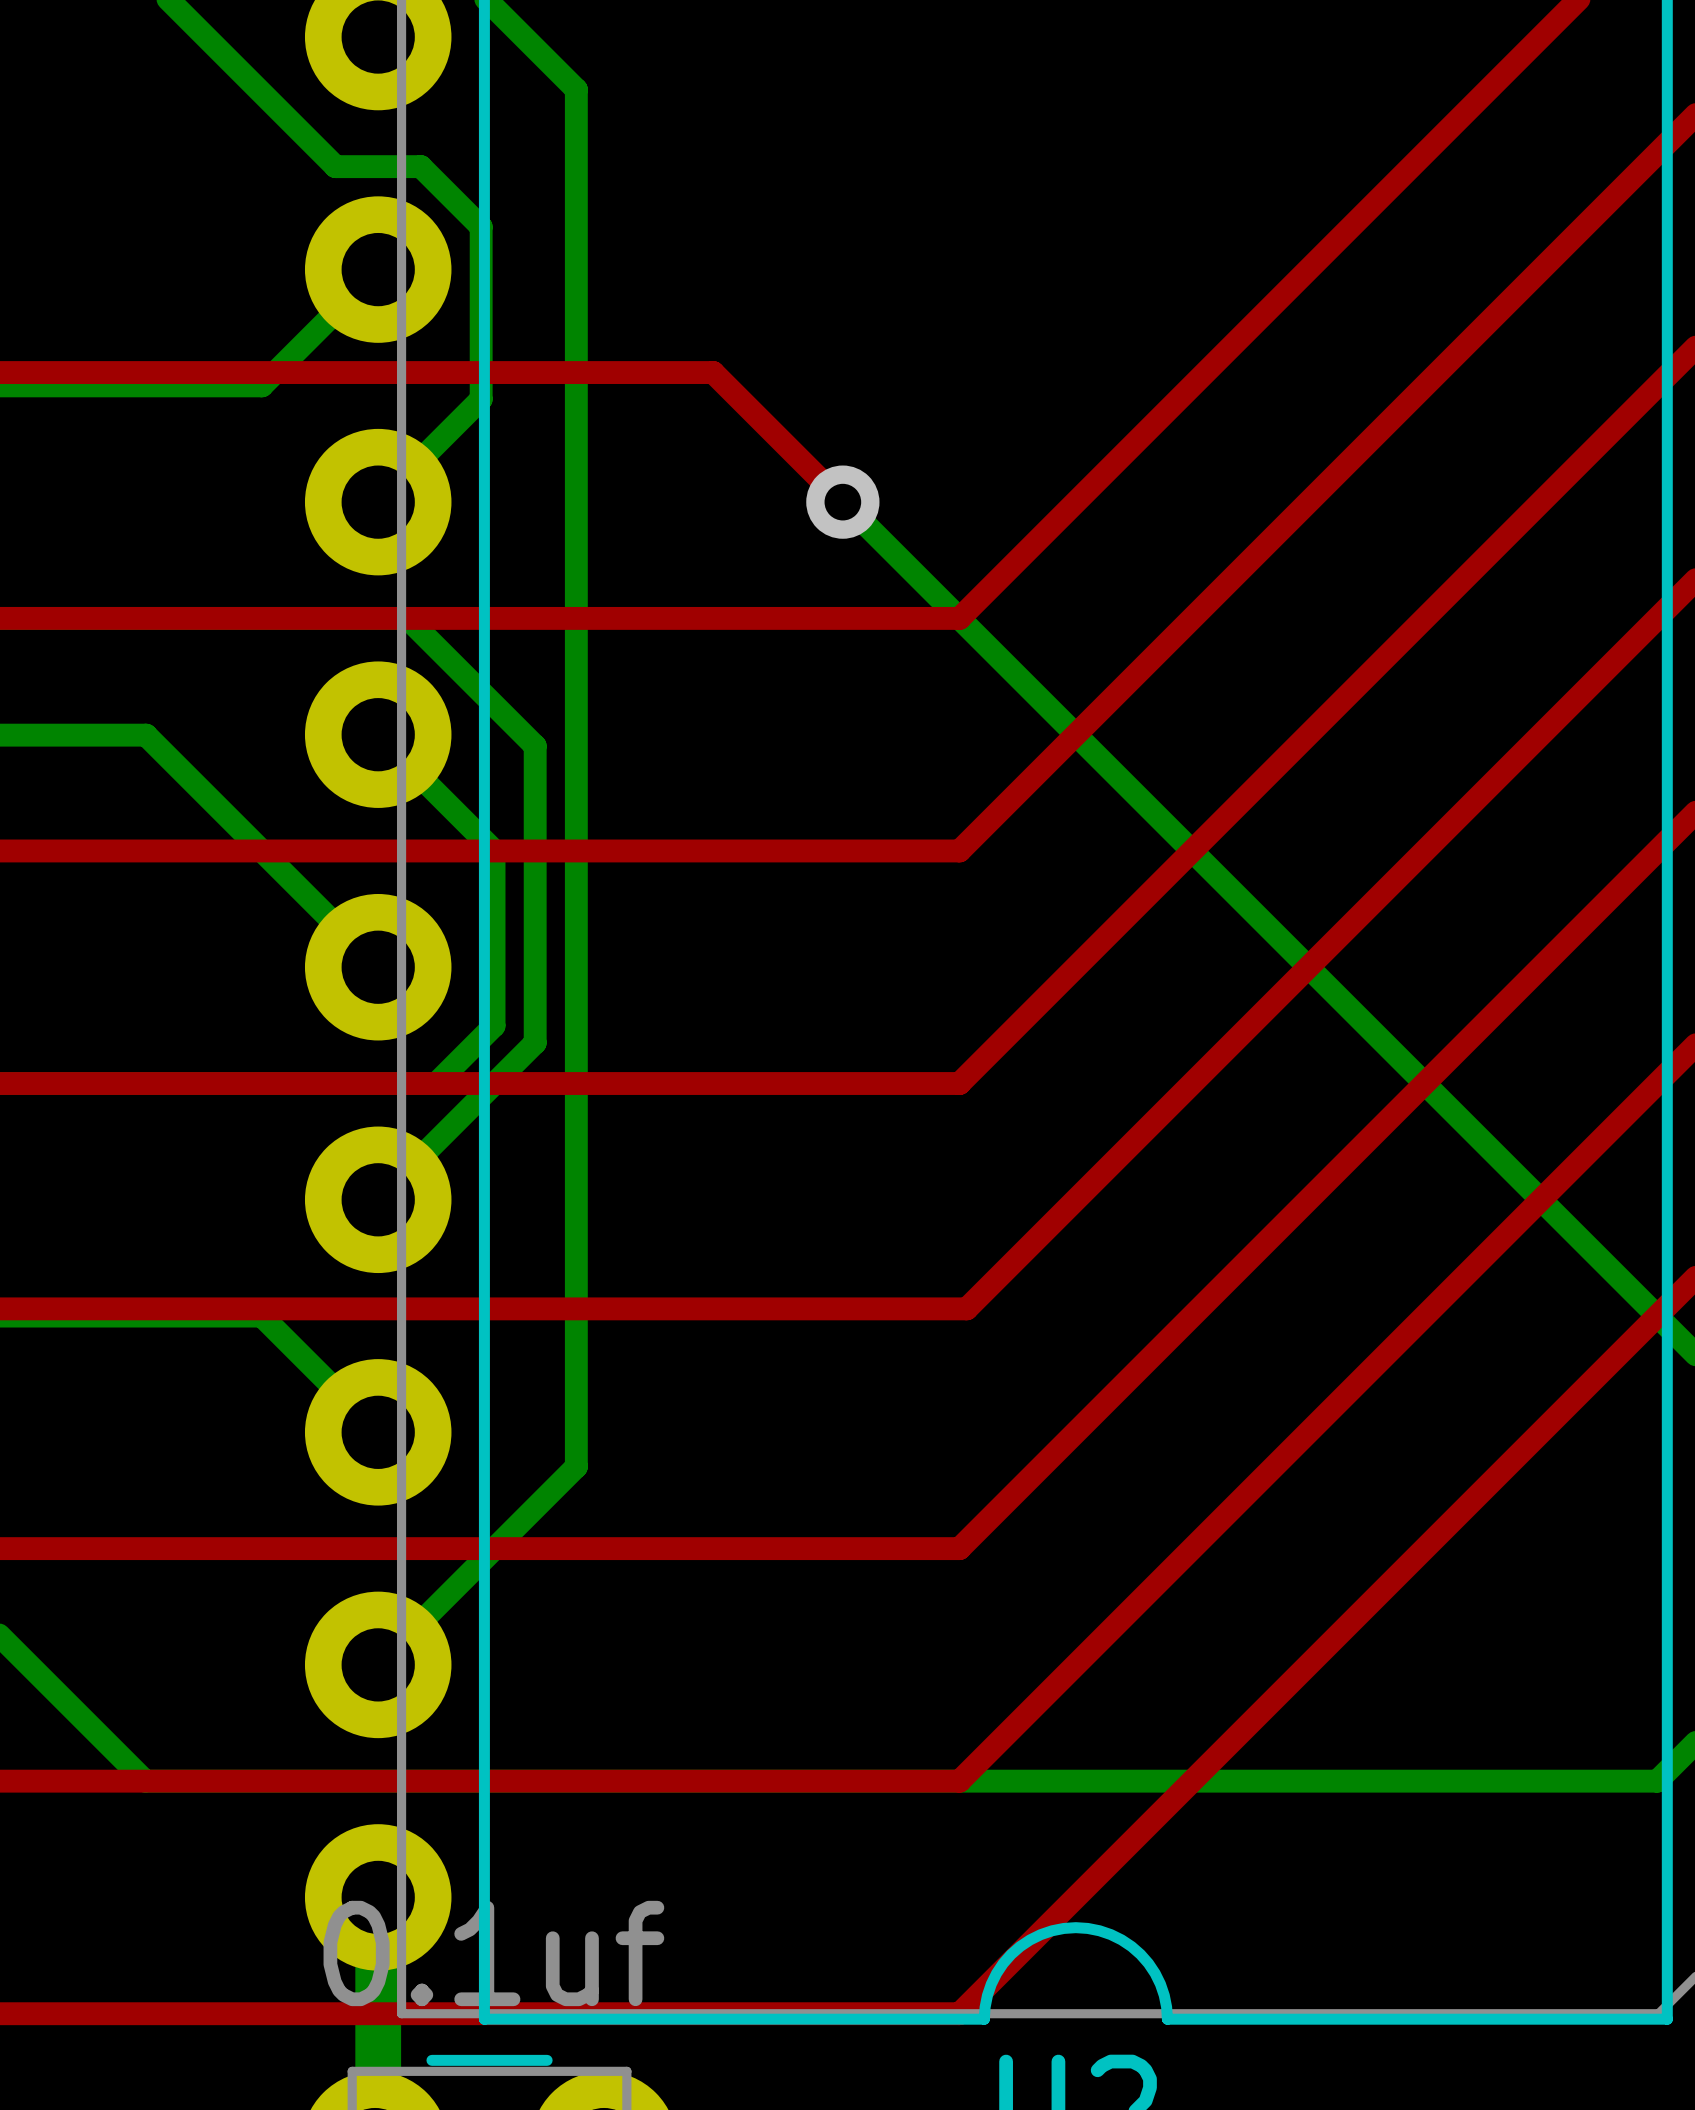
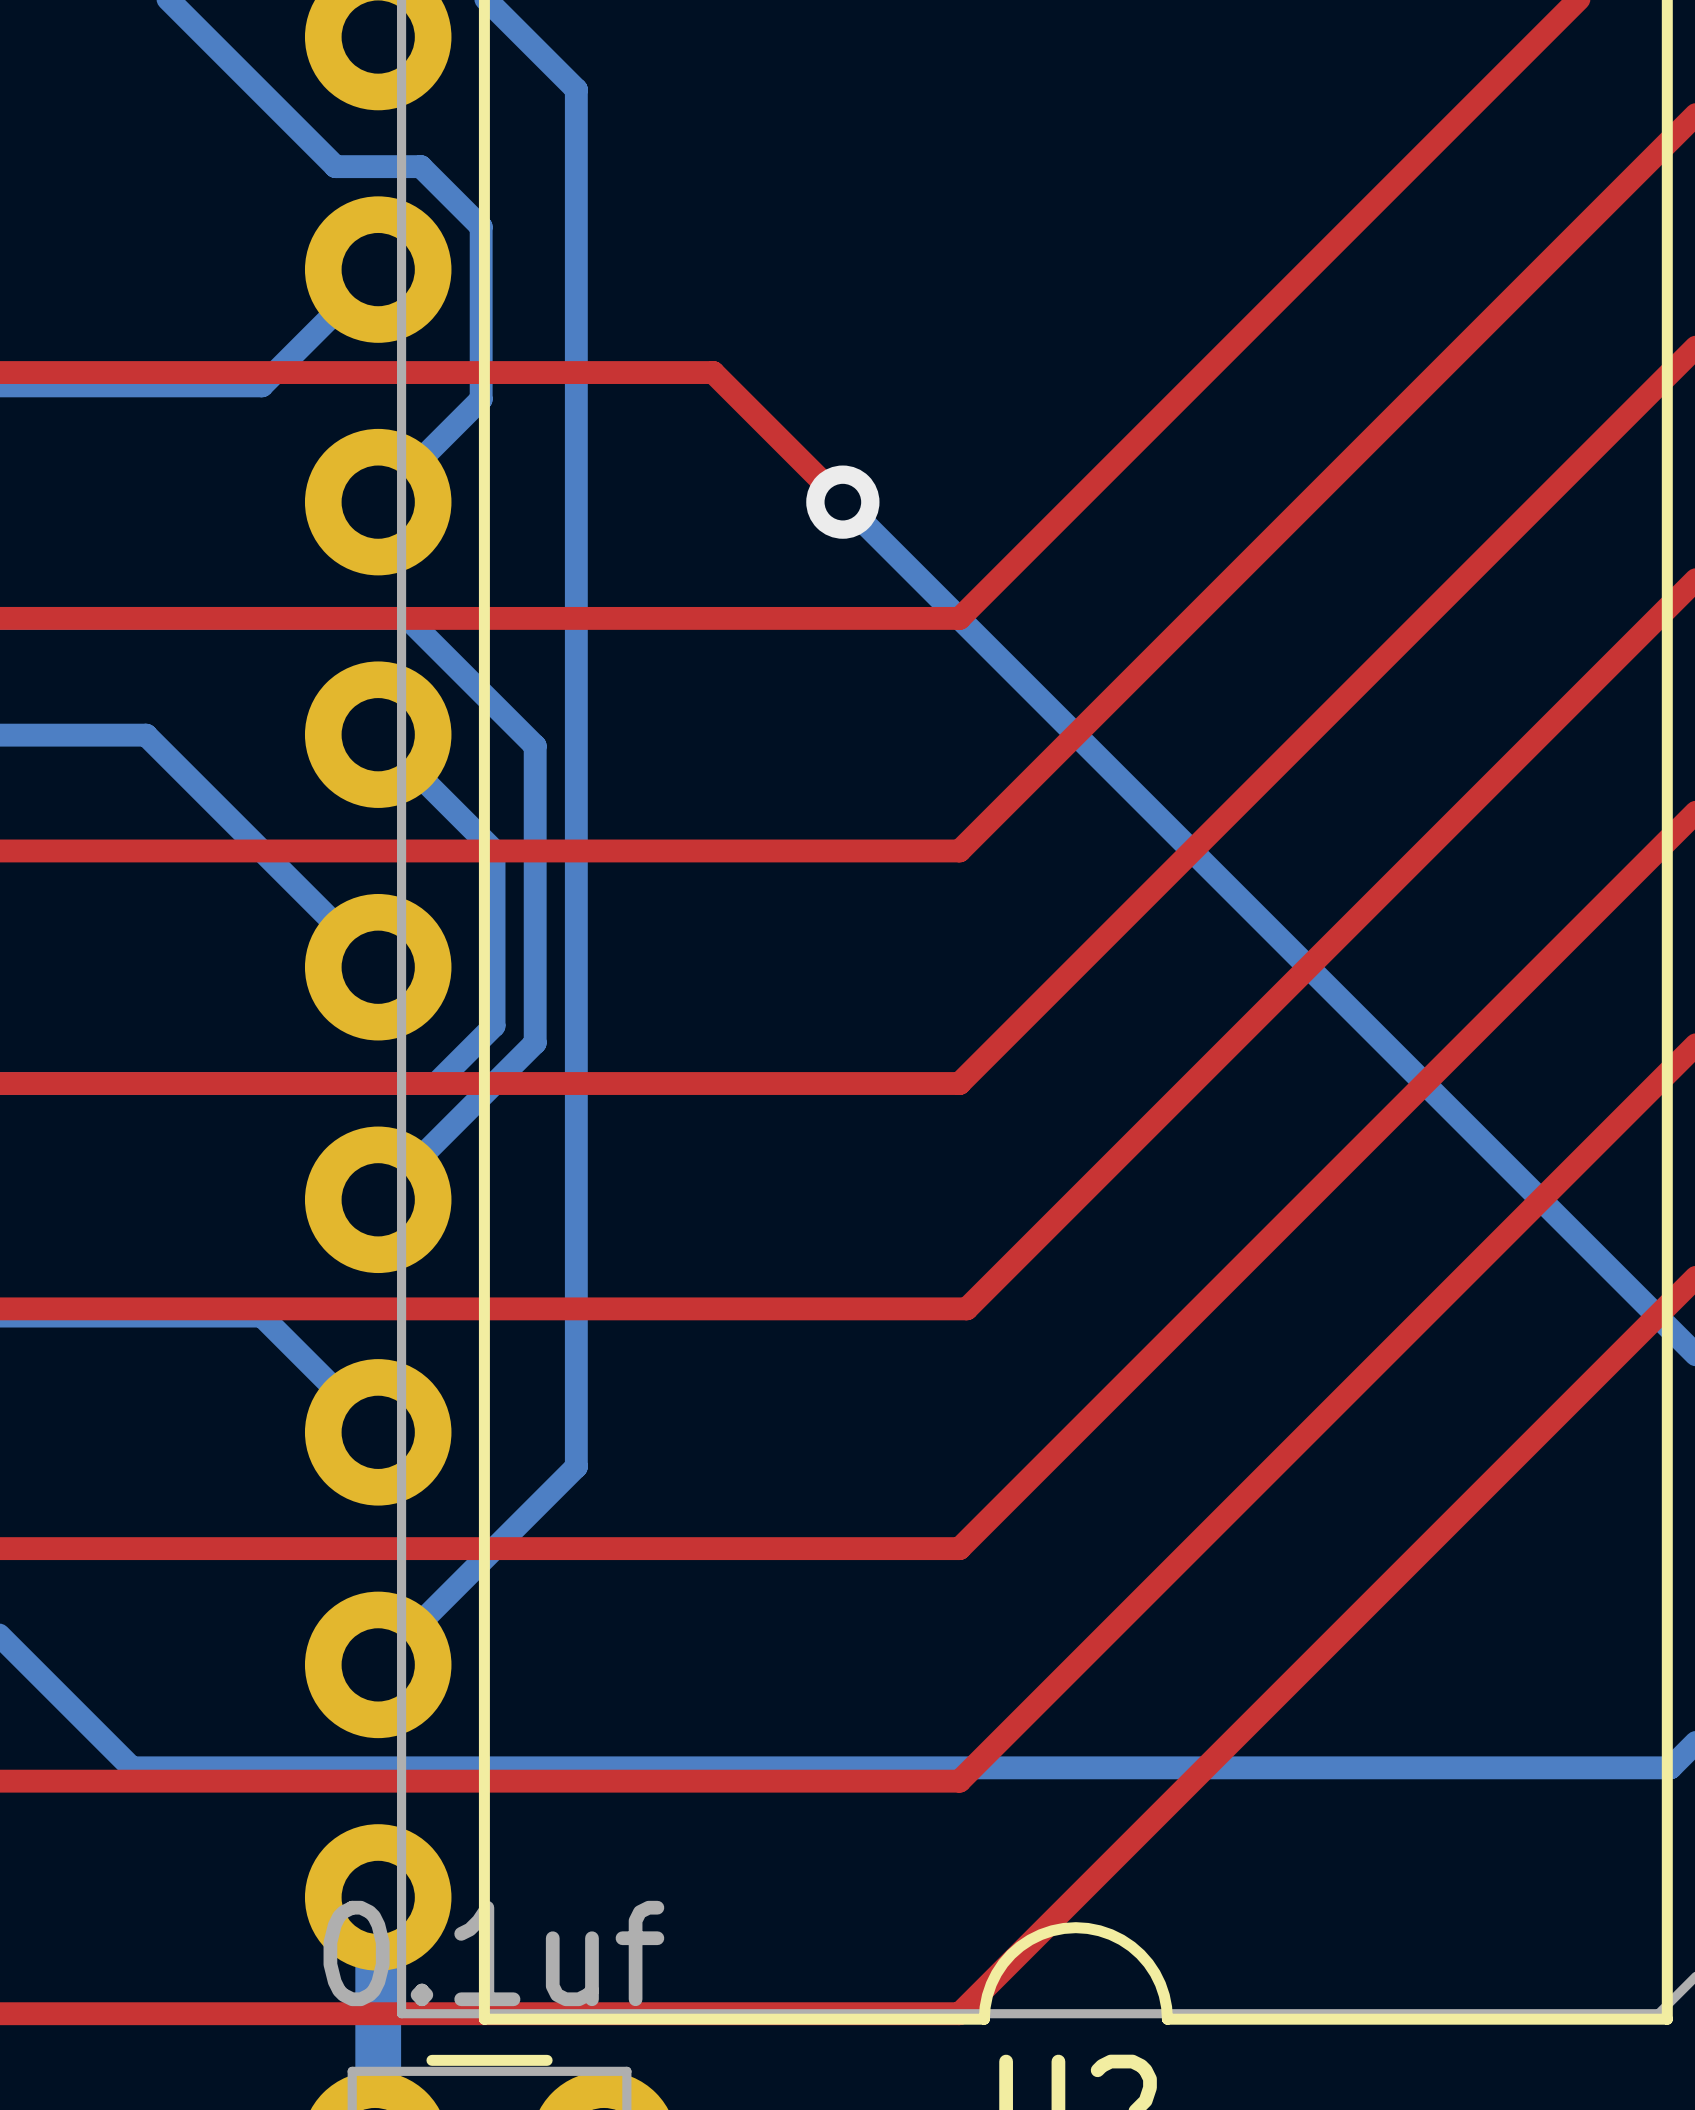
bottom track: (131, 1767) (145, 1781) (1657, 1781) (1670, 1767) -> (131, 1767) (1670, 1767)

